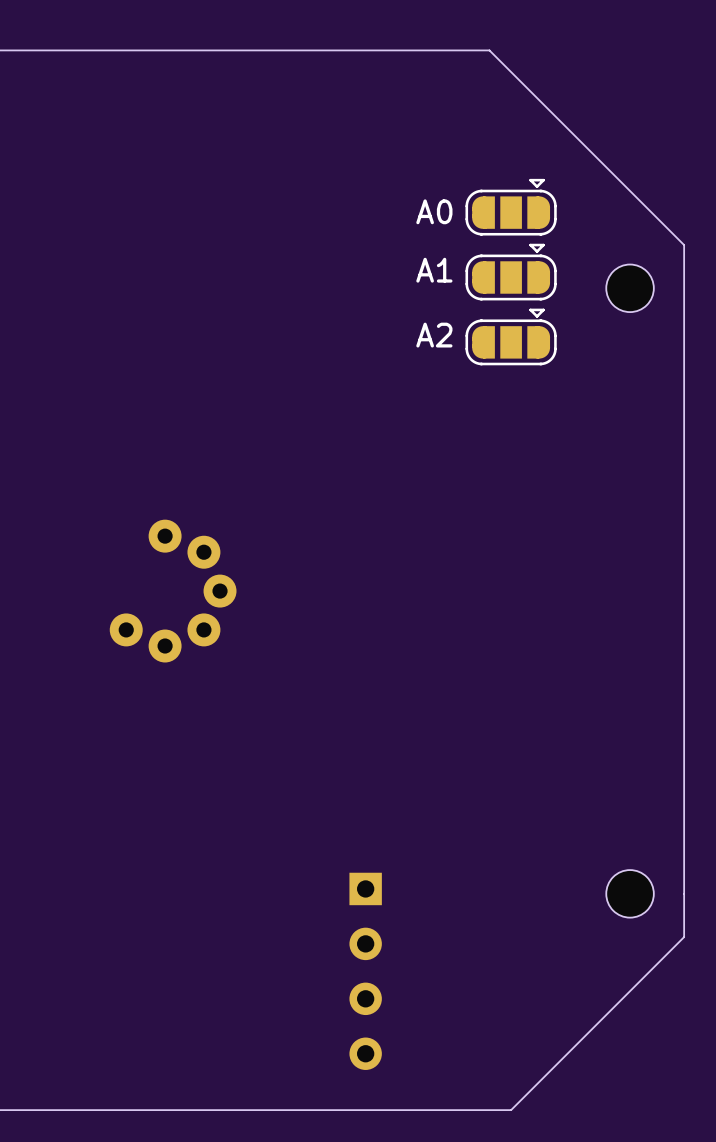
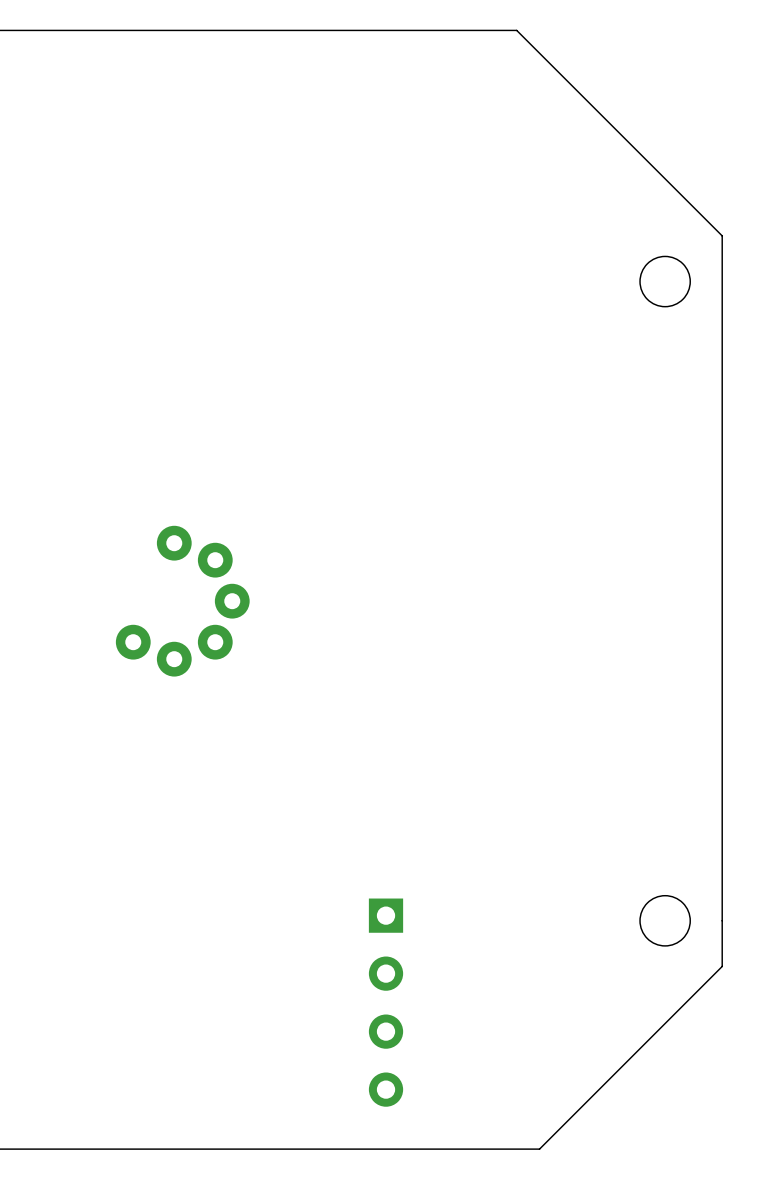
A0: (511, 207) -> none
A1: (511, 272) -> none
A2: (511, 336) -> none

